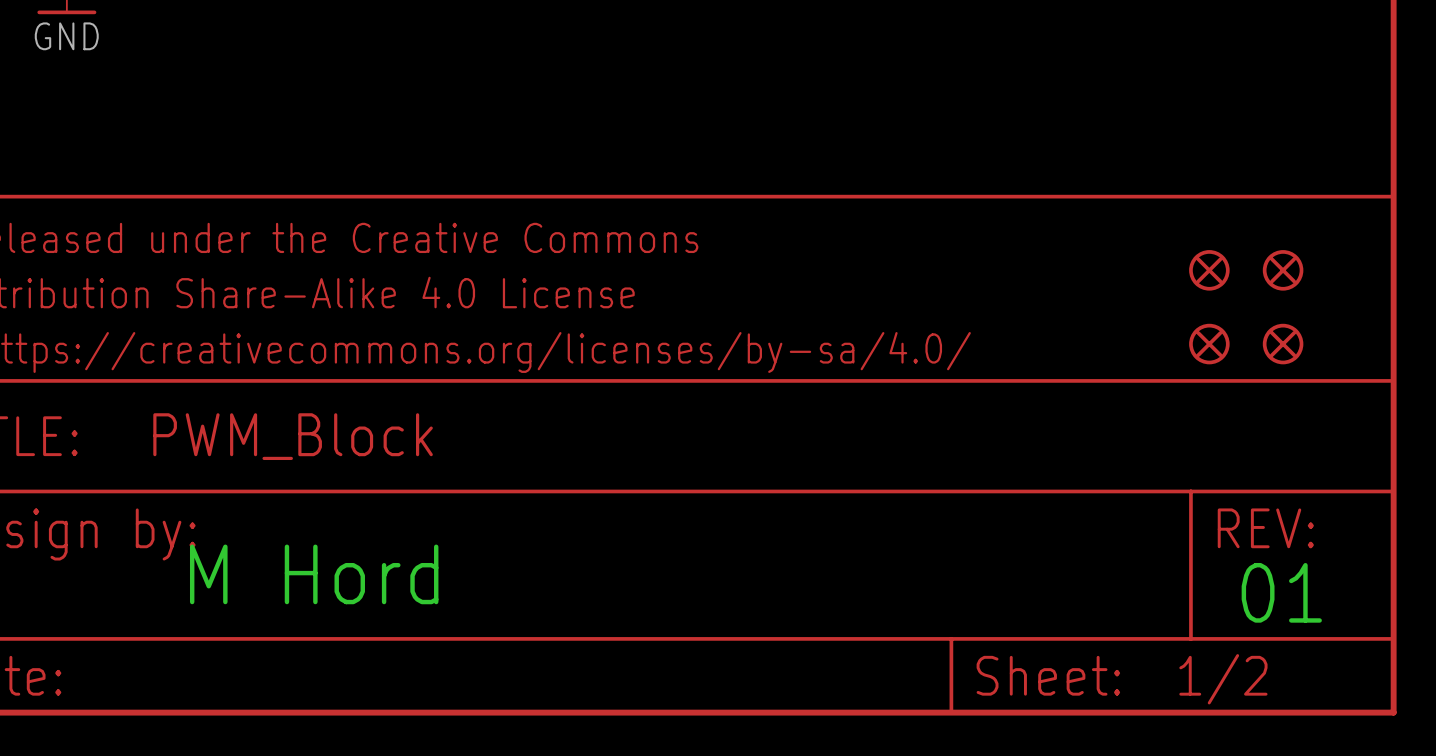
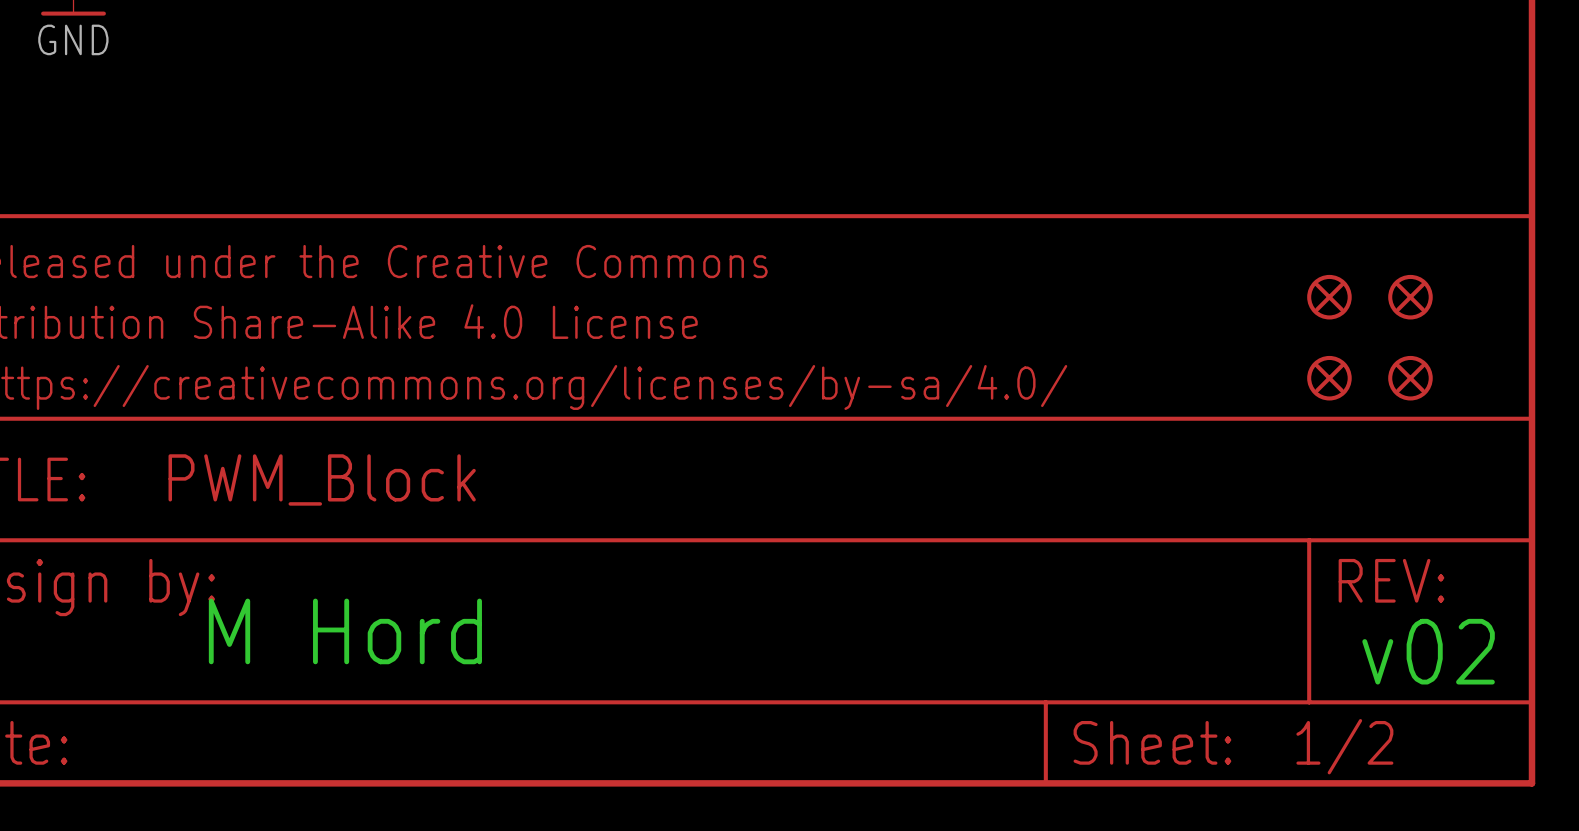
text: 01 (1281, 592) -> v02 (1428, 651)

